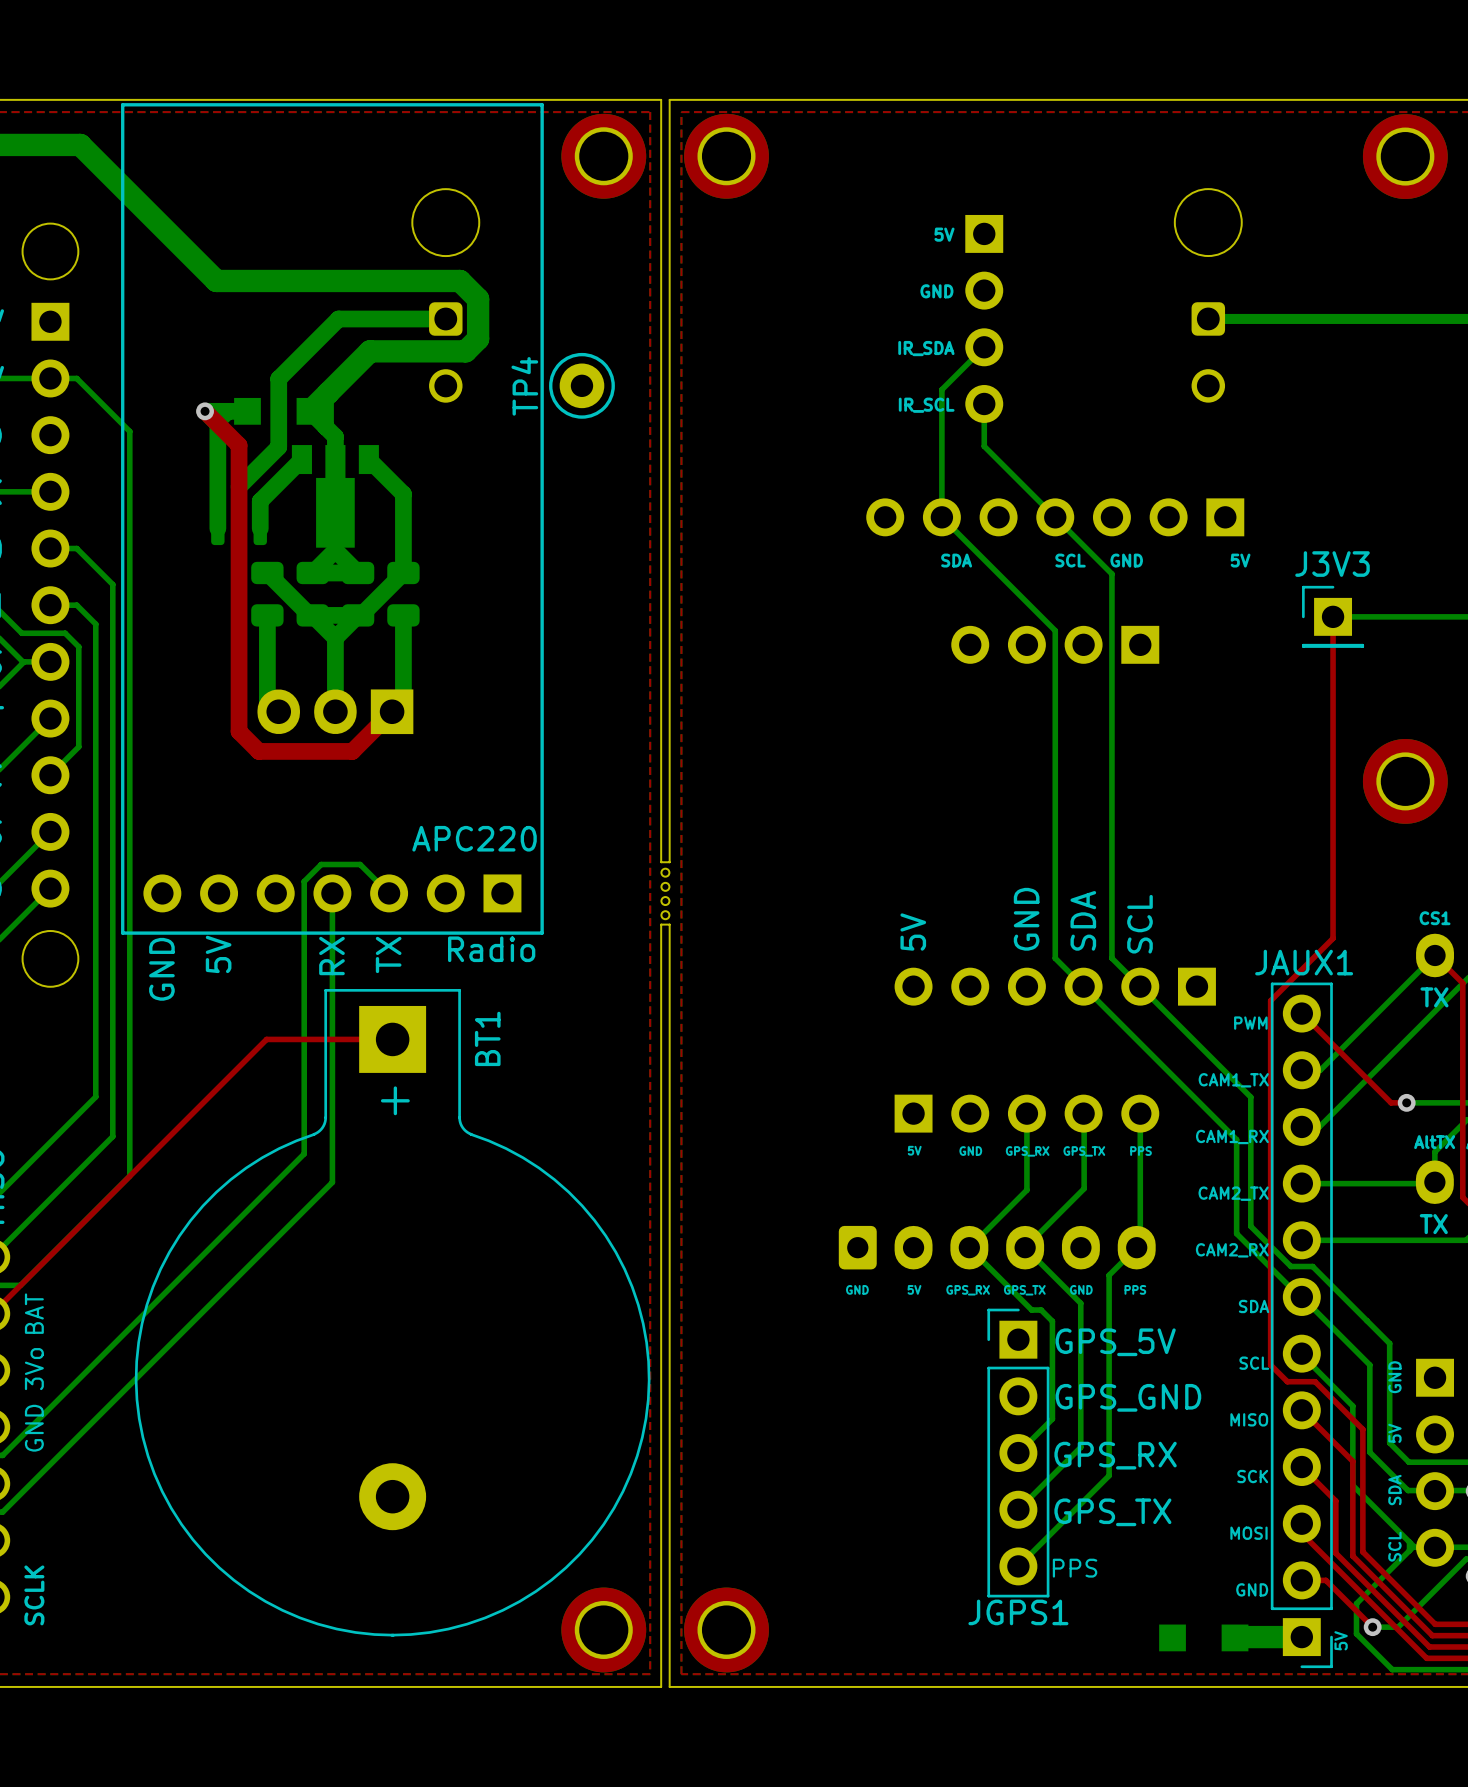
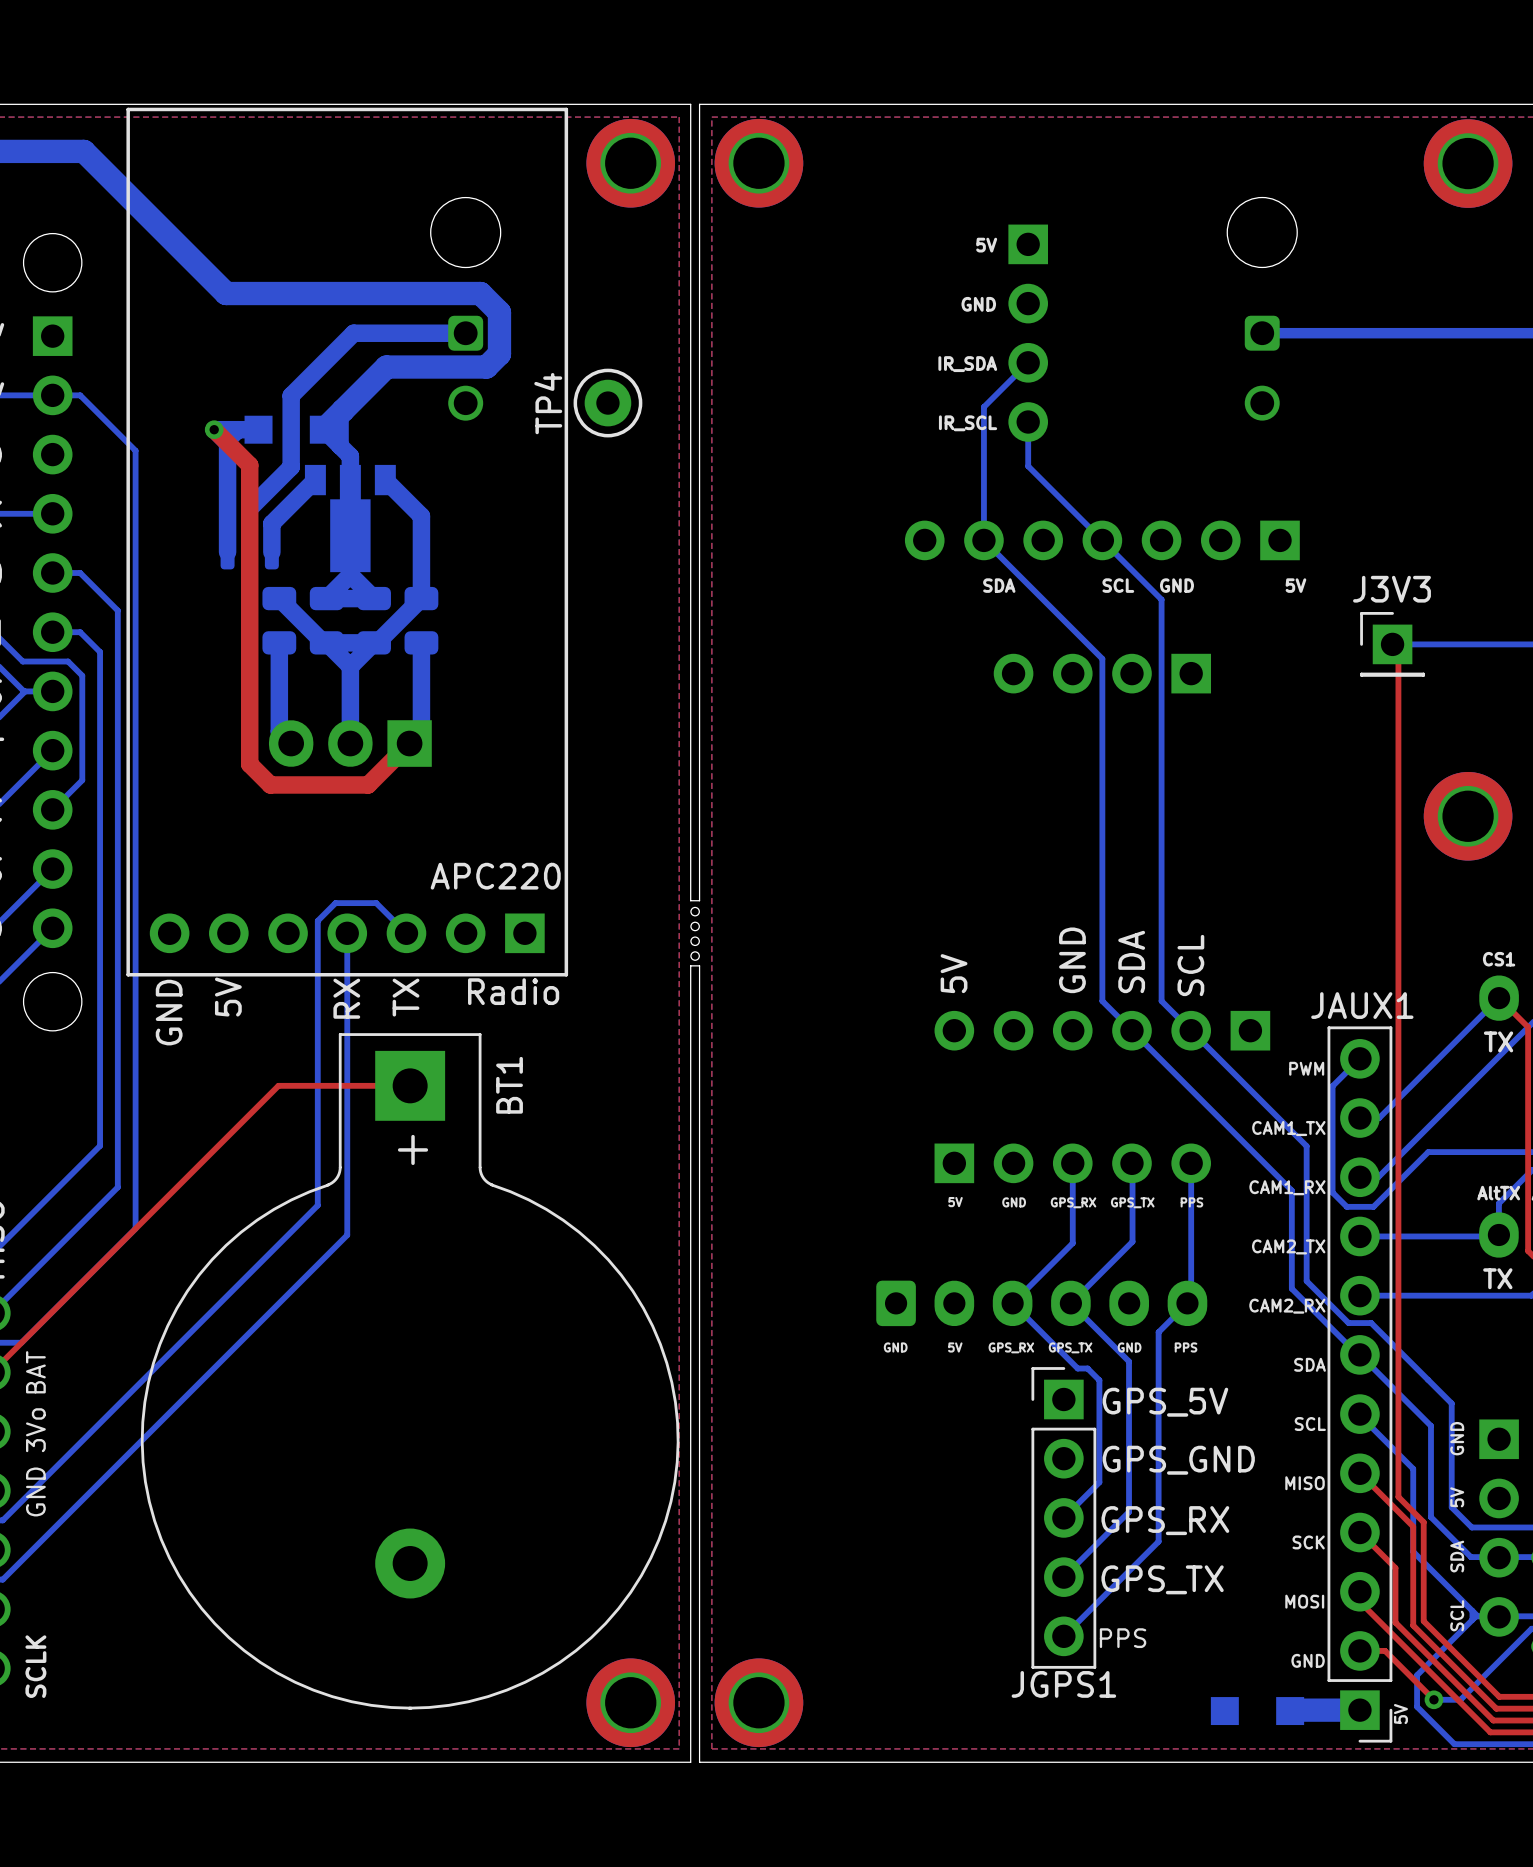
top track: (1333, 616) (1333, 938) (1270, 1000) (1270, 1364) (1287, 1381) (1315, 1381) (1362, 1429) (1362, 1457) -> (1398, 650) (1398, 1496) (1423, 1522)
top track: (1301, 1013) (1391, 1102) (1406, 1102) -> none
bottom track: none -> (1359, 1058) (1332, 1086) (1332, 1192) (1346, 1206) (1373, 1206) (1428, 1152) (1469, 1152)
via: (1406, 1102) -> none

